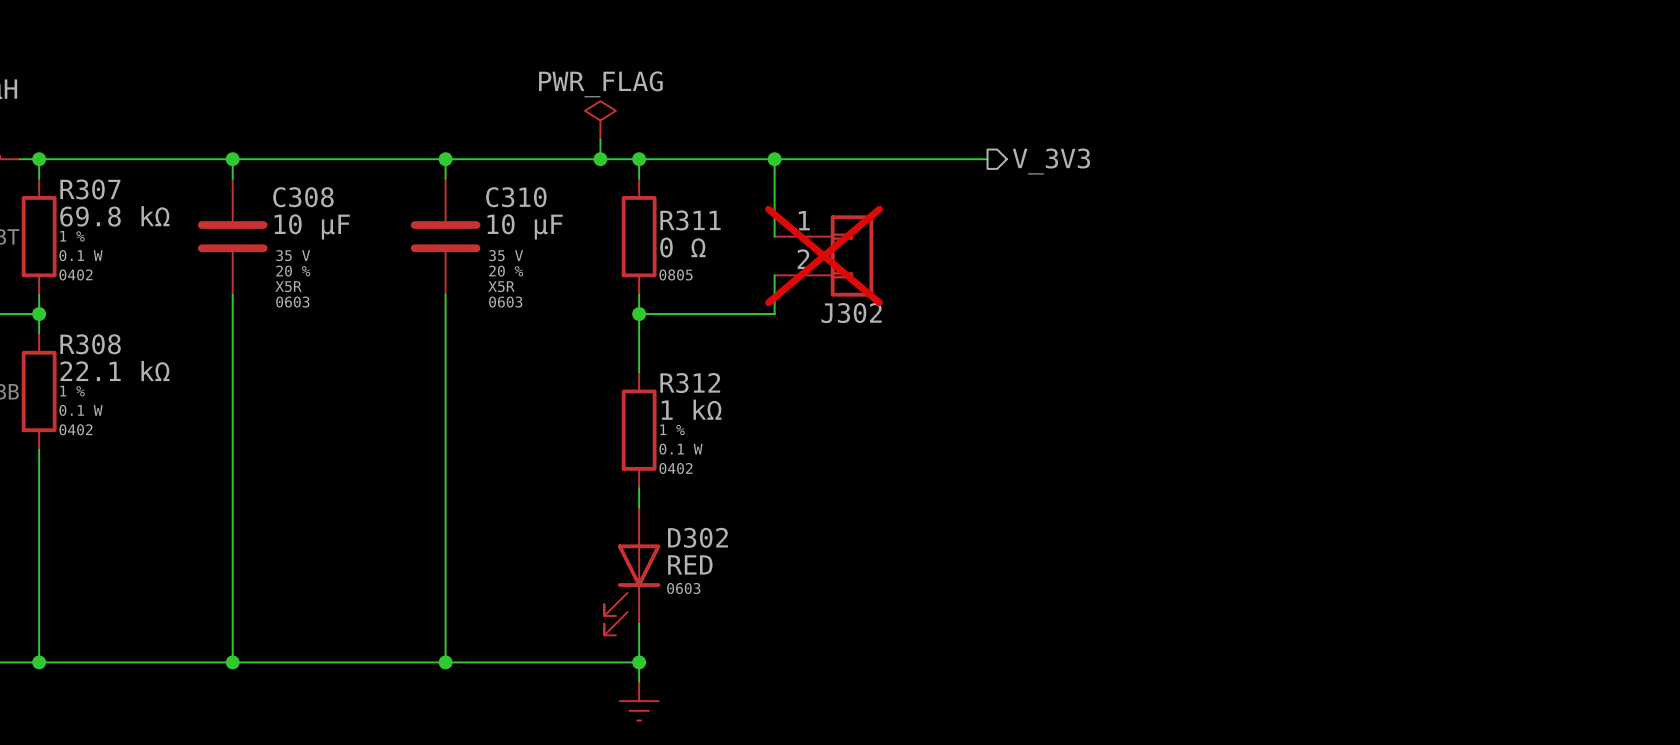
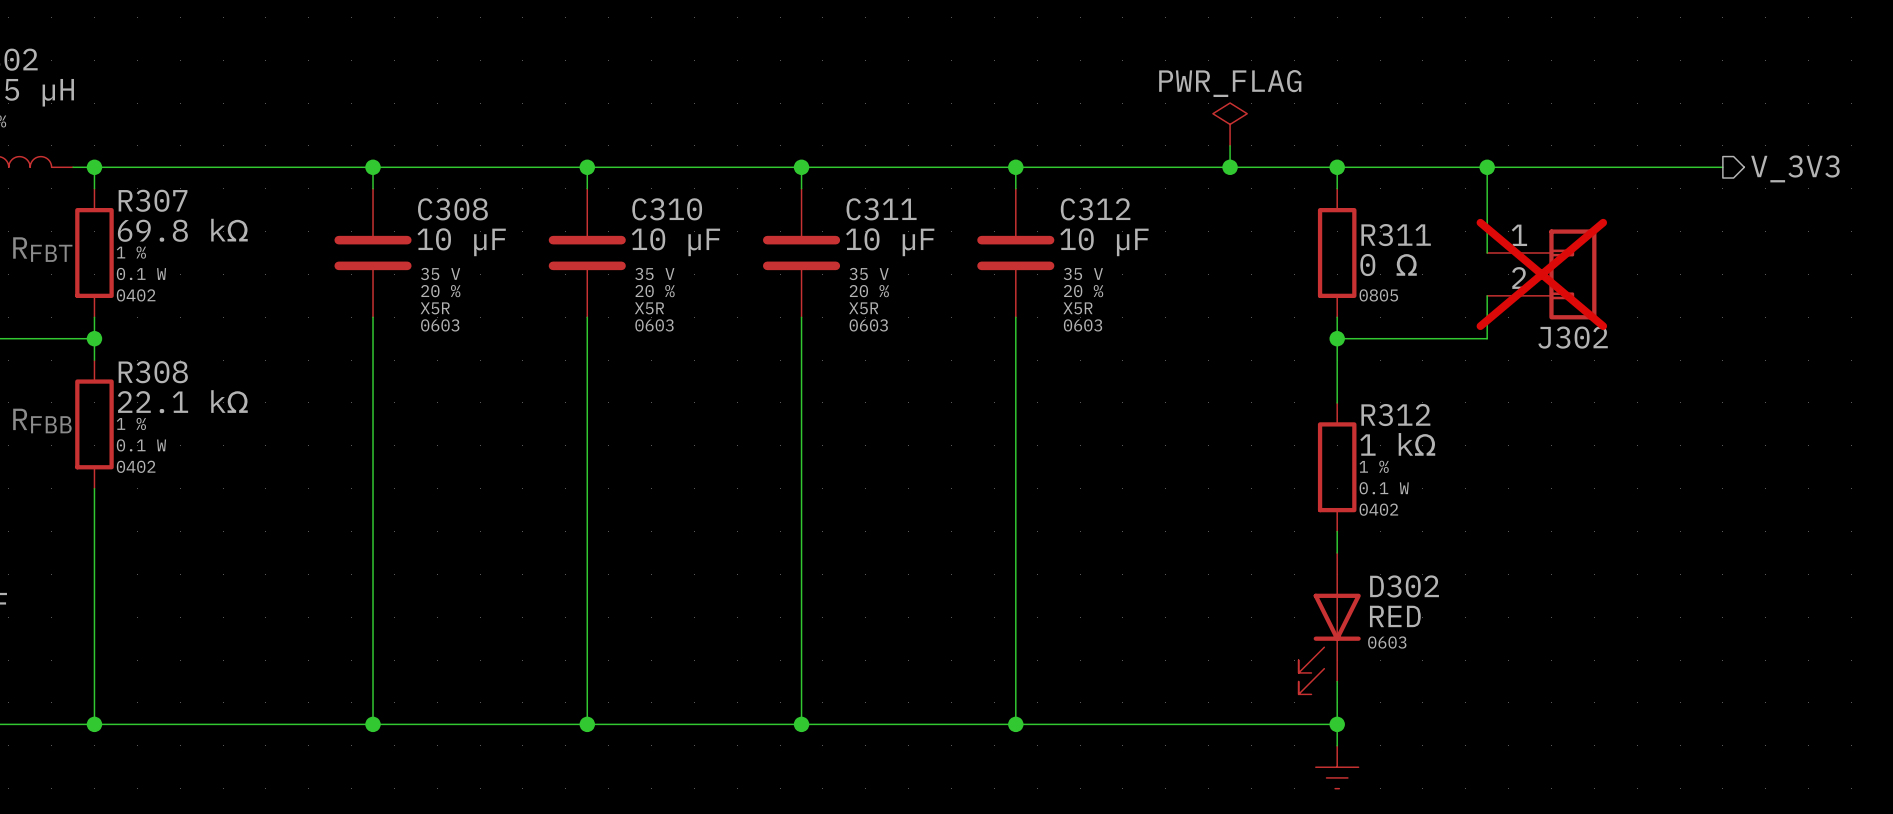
power symbol: PWR_FLAG (600, 120) -> none
power symbol: none -> PWR_FLAG (1230, 124)
wire: (600, 139) (600, 159) -> (1015, 167) (1015, 188)
wire: none -> (1230, 145) (1230, 167)
wire: (232, 159) (232, 178) -> (373, 167) (373, 188)
junction position: (232, 159) -> (373, 167)
wire: (445, 159) (445, 178) -> (587, 167) (587, 188)
junction position: (445, 159) -> (587, 167)
junction: (600, 159) -> none
wire: (639, 159) (639, 178) -> (801, 167) (801, 188)
junction: (639, 159) -> none
junction: none -> (801, 167)
wire: (774, 159) (774, 236) -> none
junction: (774, 159) -> none
junction: none -> (1015, 167)
wire: none -> (1144, 167) (1722, 167)
junction: none -> (1230, 167)
wire: none -> (1337, 167) (1337, 188)
junction: none -> (1337, 167)
wire: none -> (1487, 167) (1487, 253)
junction: none -> (1487, 167)
hierarchical label: V_3V3 (1051, 161) -> none
hierarchical label: none -> V_3V3 (1795, 168)
C308 position: (232, 236) -> (373, 253)
C310 position: (445, 236) -> (587, 253)
R311 position: (639, 236) -> (1337, 253)
C311: none -> 10 µF (801, 253)
C312: none -> 10 µF (1015, 253)
J302 position: (823, 255) -> (1541, 274)
wire: (774, 275) (774, 314) (639, 314) -> none
wire: none -> (1487, 295) (1487, 338) (1337, 338)
wire: (232, 294) (232, 662) -> (373, 317) (373, 724)
wire: (445, 294) (445, 662) -> (587, 317) (587, 724)
wire: (639, 294) (639, 372) -> none
wire: none -> (801, 317) (801, 724)
wire: none -> (1015, 317) (1015, 724)
wire: none -> (1337, 317) (1337, 402)
junction: (639, 314) -> none
junction: none -> (1337, 338)
R312 position: (639, 430) -> (1337, 467)
wire: (639, 488) (639, 507) -> none
wire: none -> (1337, 531) (1337, 552)
D302 position: (632, 571) -> (1329, 623)
wire: (639, 623) (639, 681) -> none
wire: none -> (1337, 681) (1337, 745)
junction position: (232, 662) -> (373, 724)
junction position: (445, 662) -> (587, 724)
wire: none -> (758, 724) (1337, 724)
junction position: (639, 662) -> (801, 724)
junction: none -> (1015, 724)
junction: none -> (1337, 724)
power symbol: (639, 701) -> none
power symbol: none -> (1337, 767)

